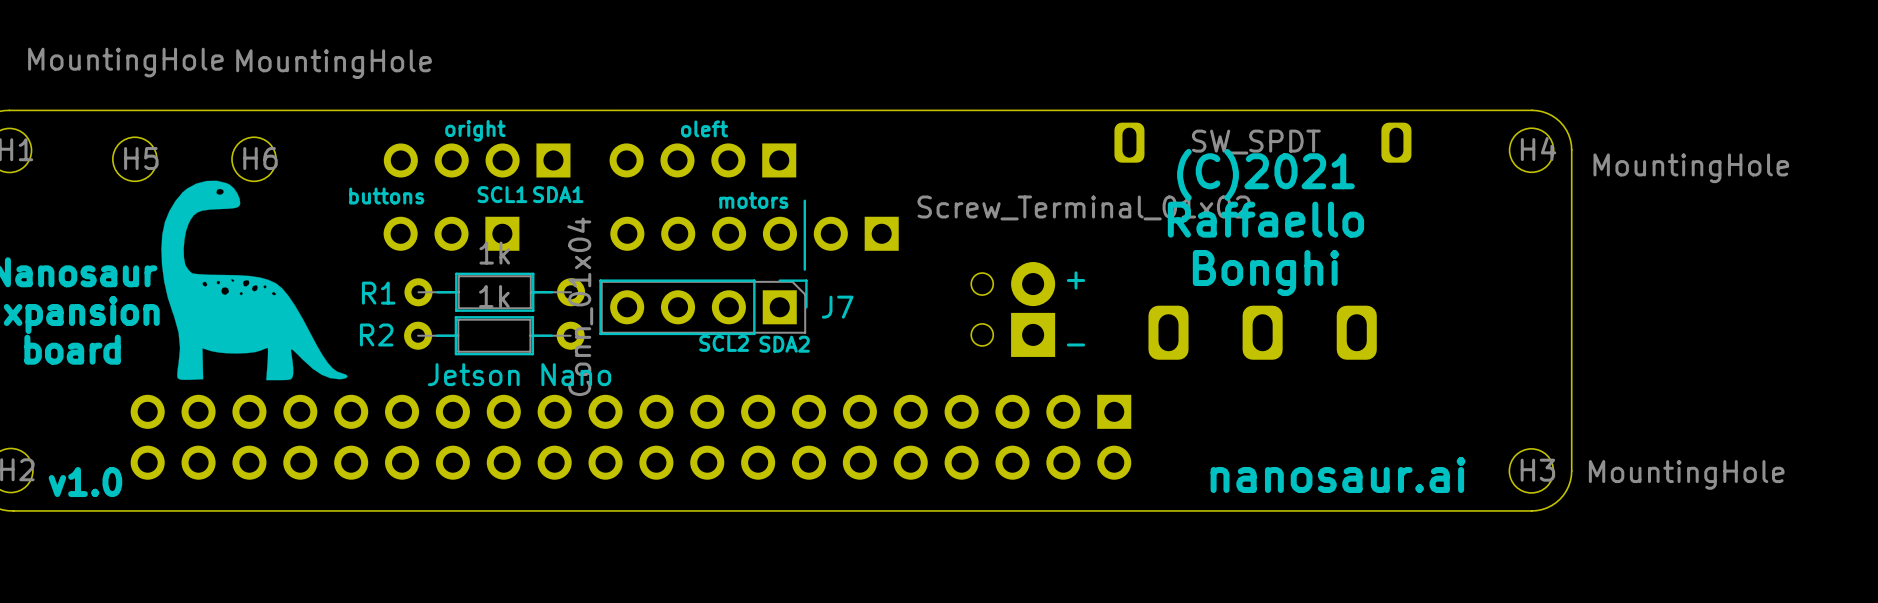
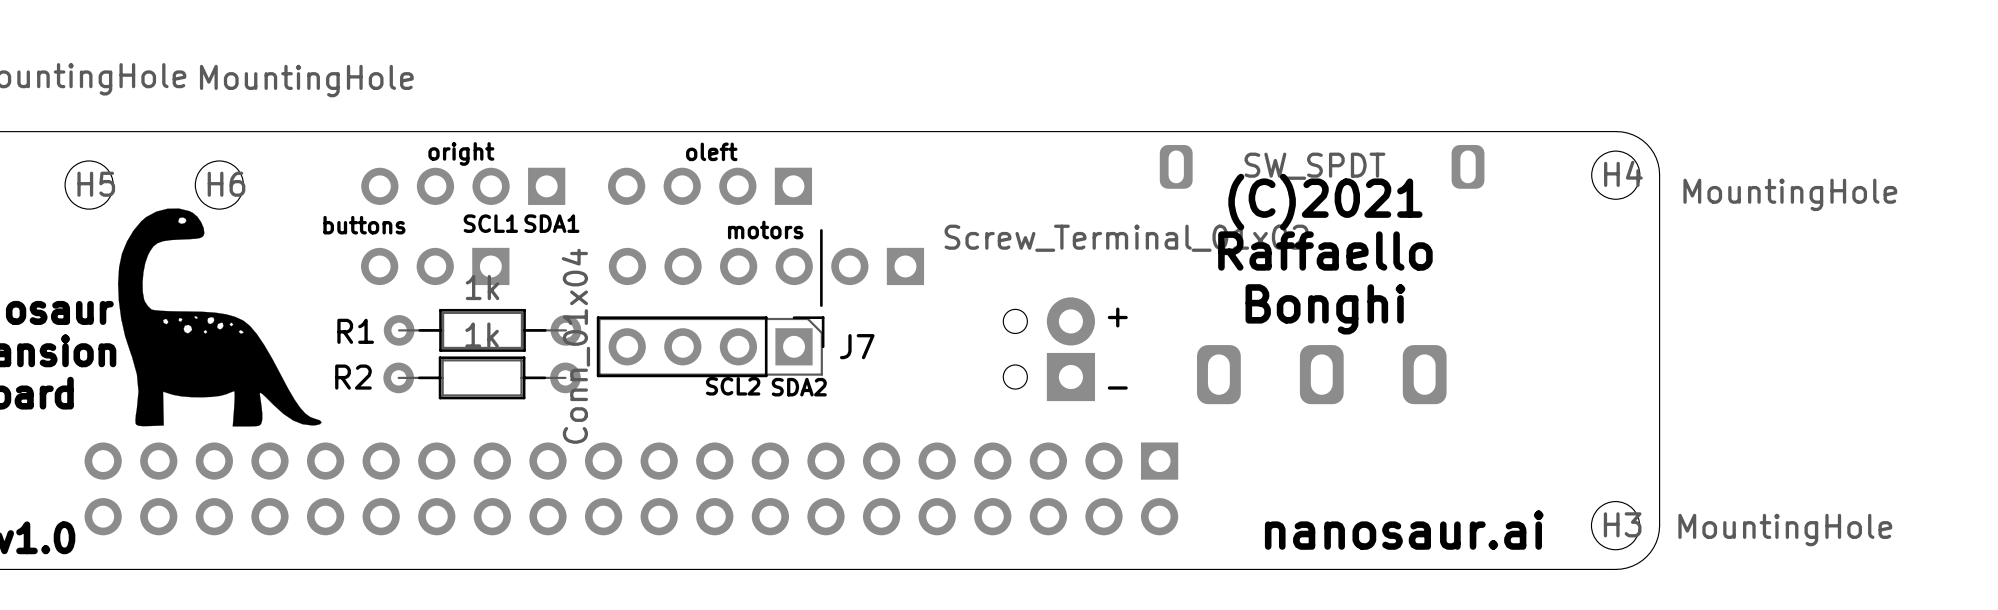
text: Jetson Nano (519, 374) -> none

